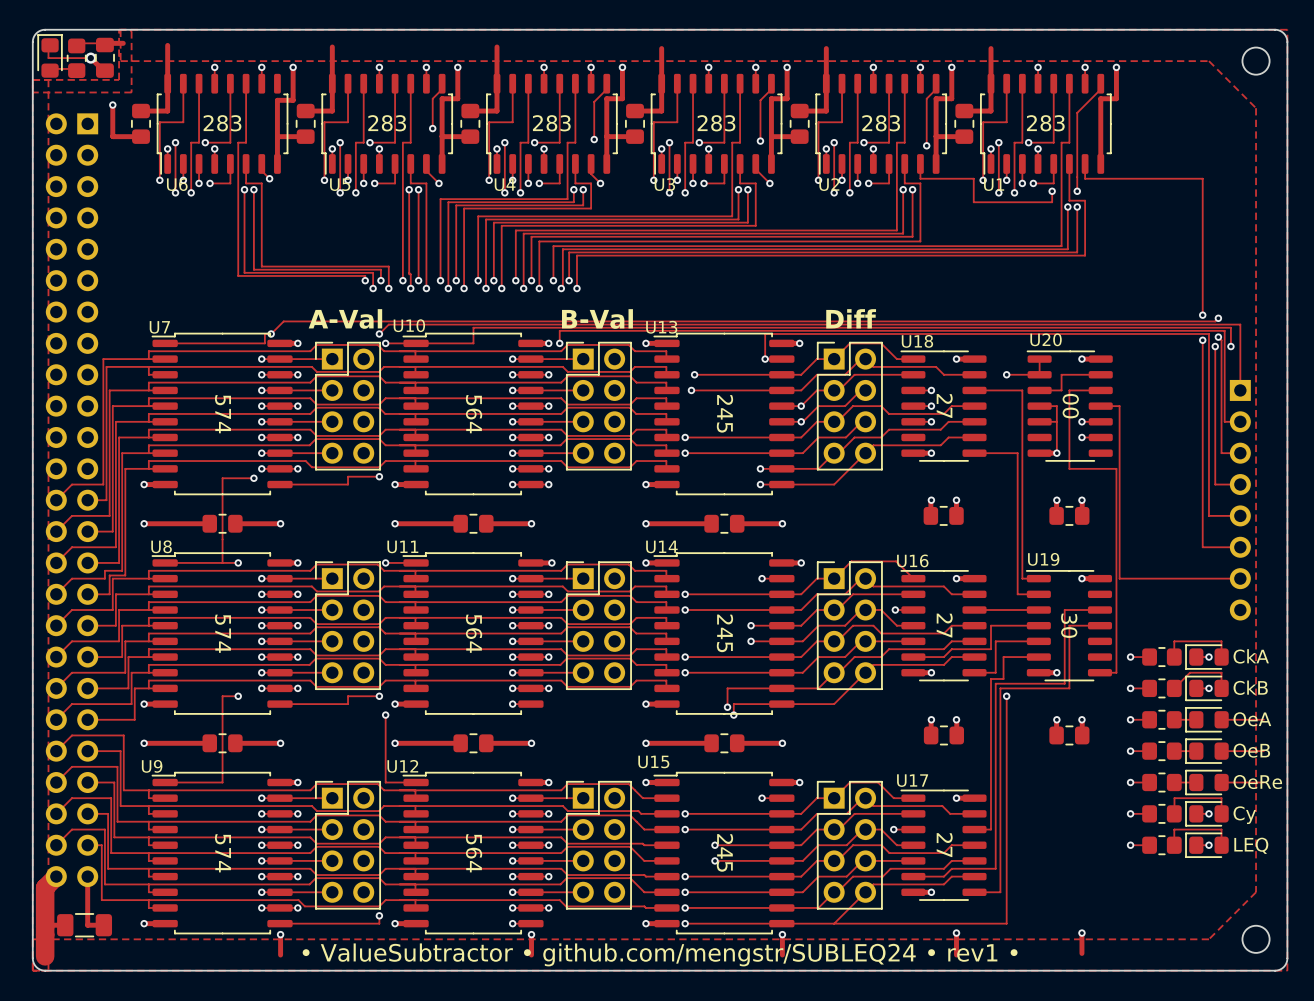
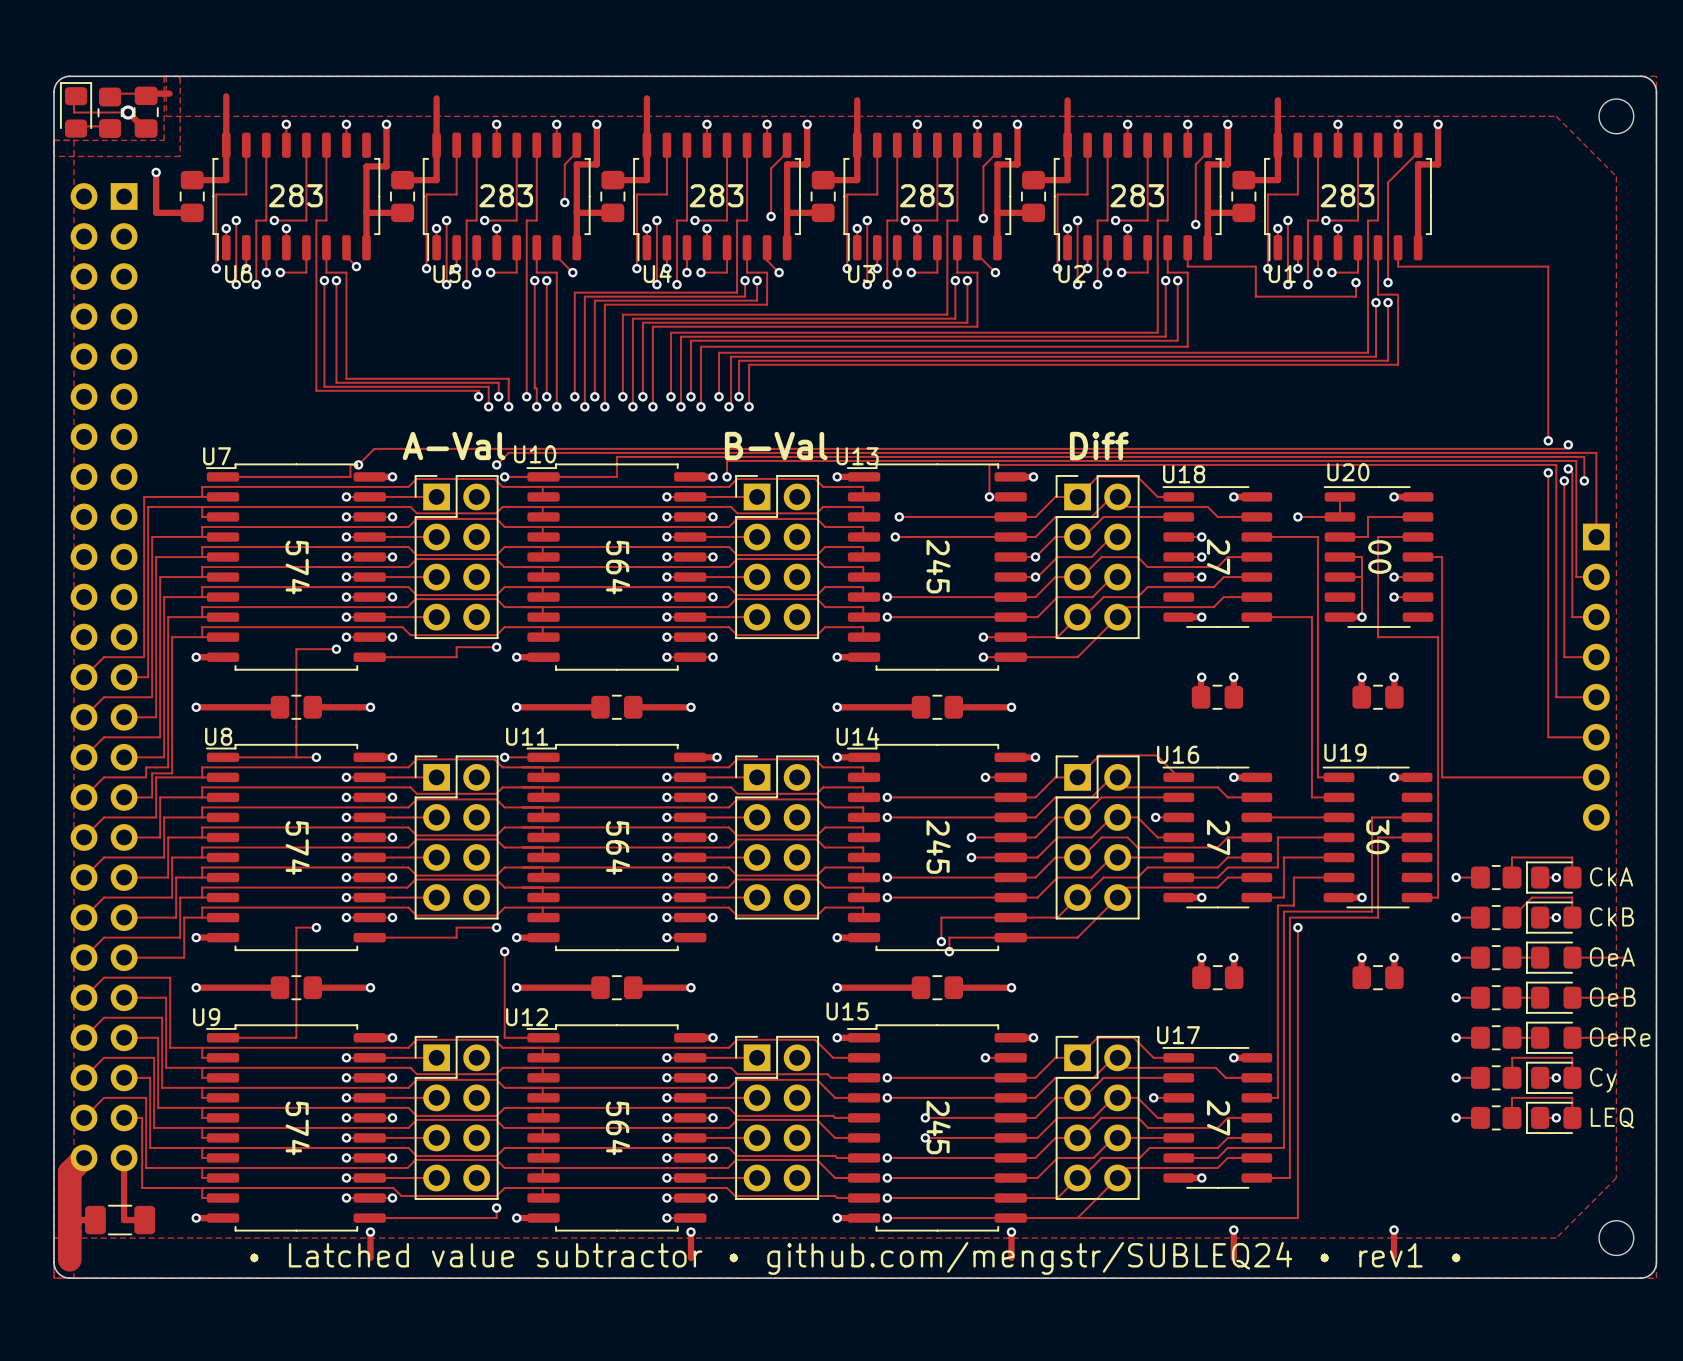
text: • ValueSubtractor • github.com/mengstr/SUBLEQ24 • rev1 • (660, 954) -> • Latched value subtractor • github.com/mengstr/SUBLEQ24 • rev1 • (855, 1258)

